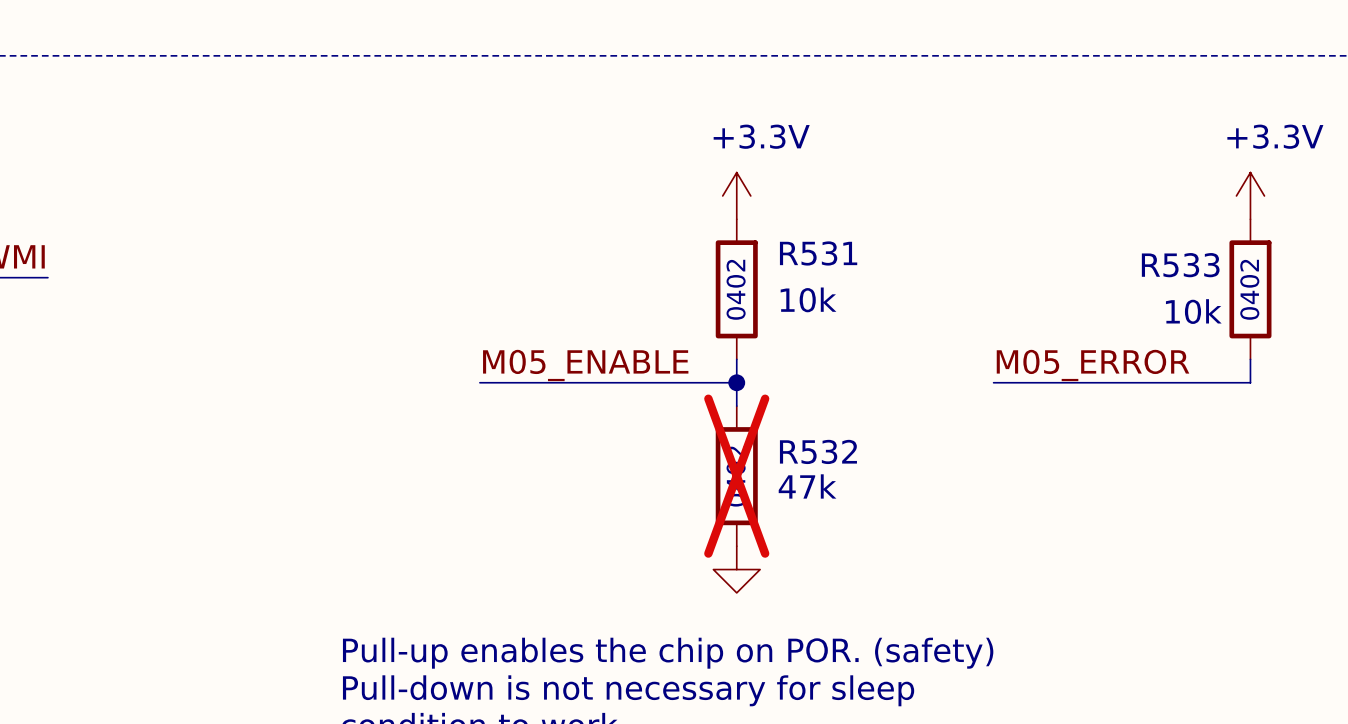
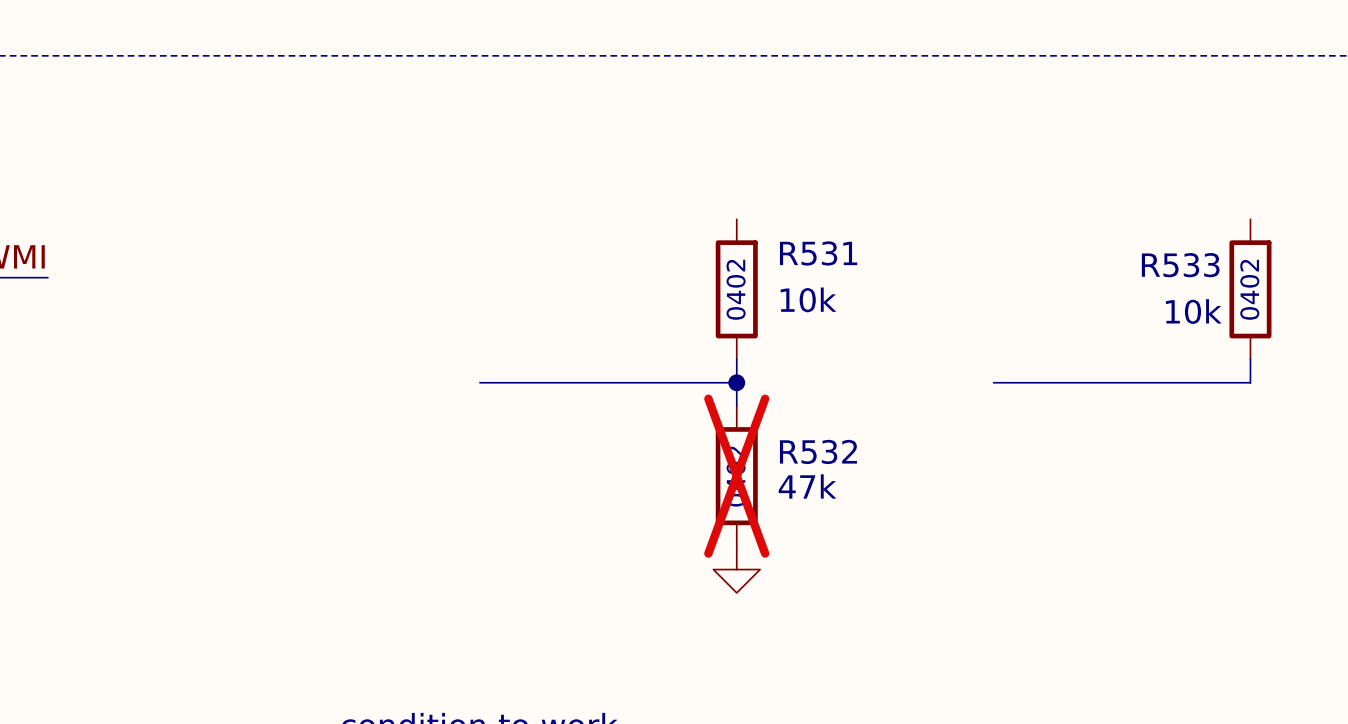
power symbol: +3.3V (736, 195) -> none
power symbol: +3.3V (1250, 195) -> none
label: M05_ENABLE (585, 365) -> none
label: M05_ERROR (1093, 365) -> none
text: Pull-up enables the chip on POR. (safety) (668, 653) -> none
text: Pull-down is not necessary for sleep (628, 690) -> none

